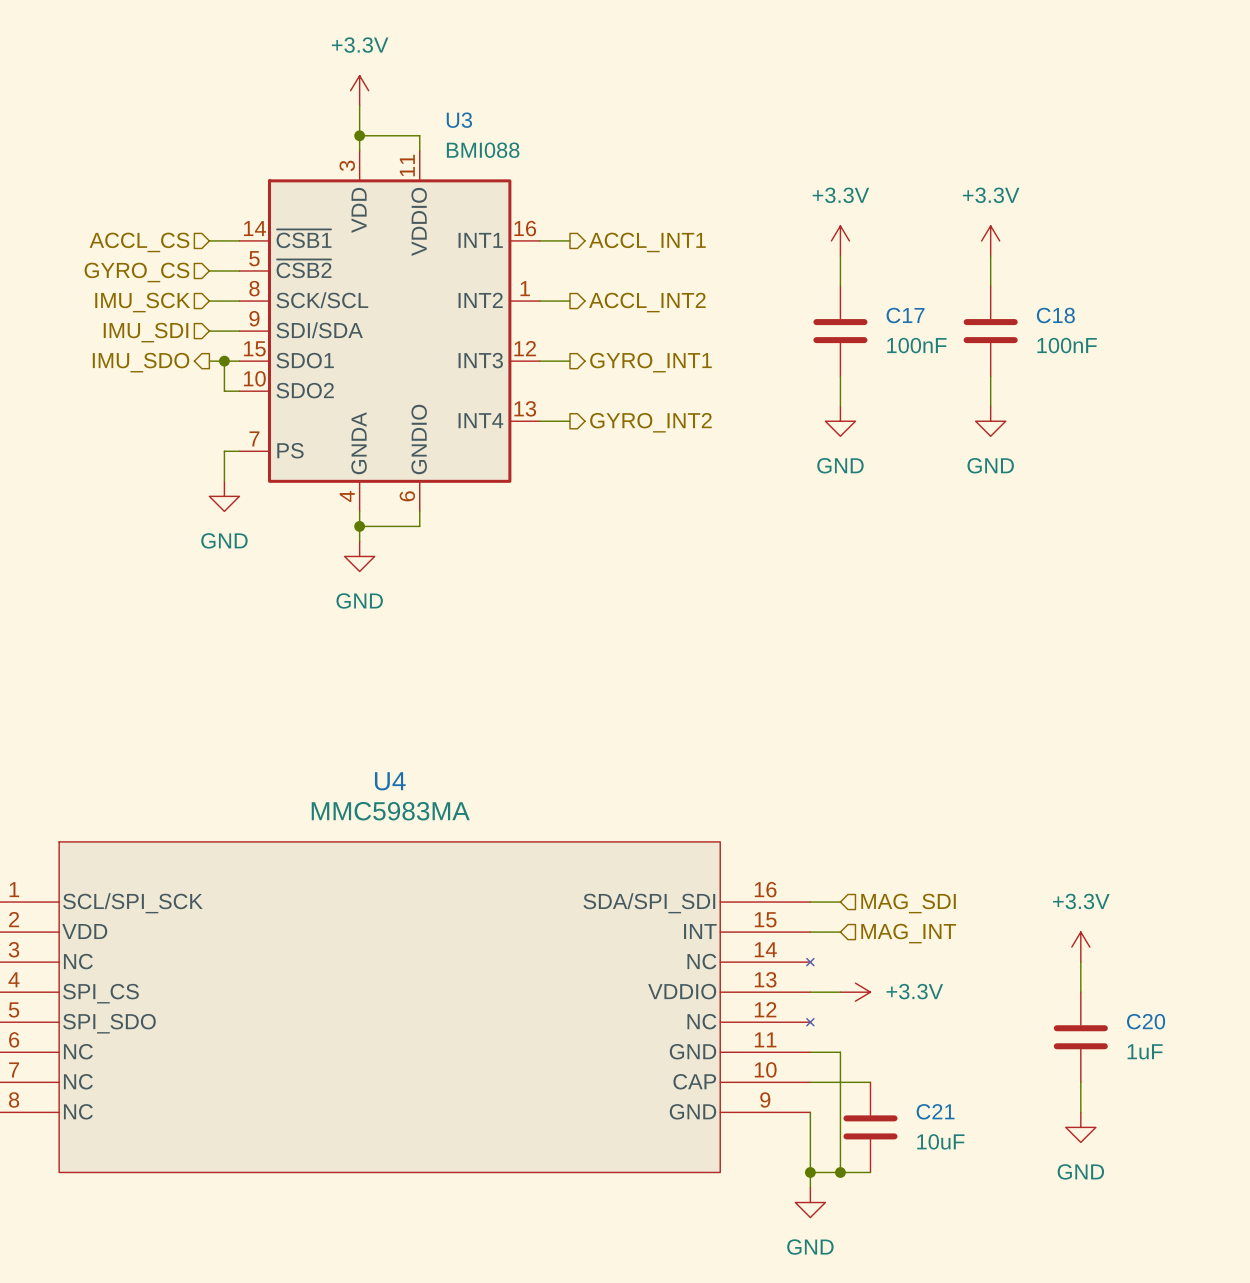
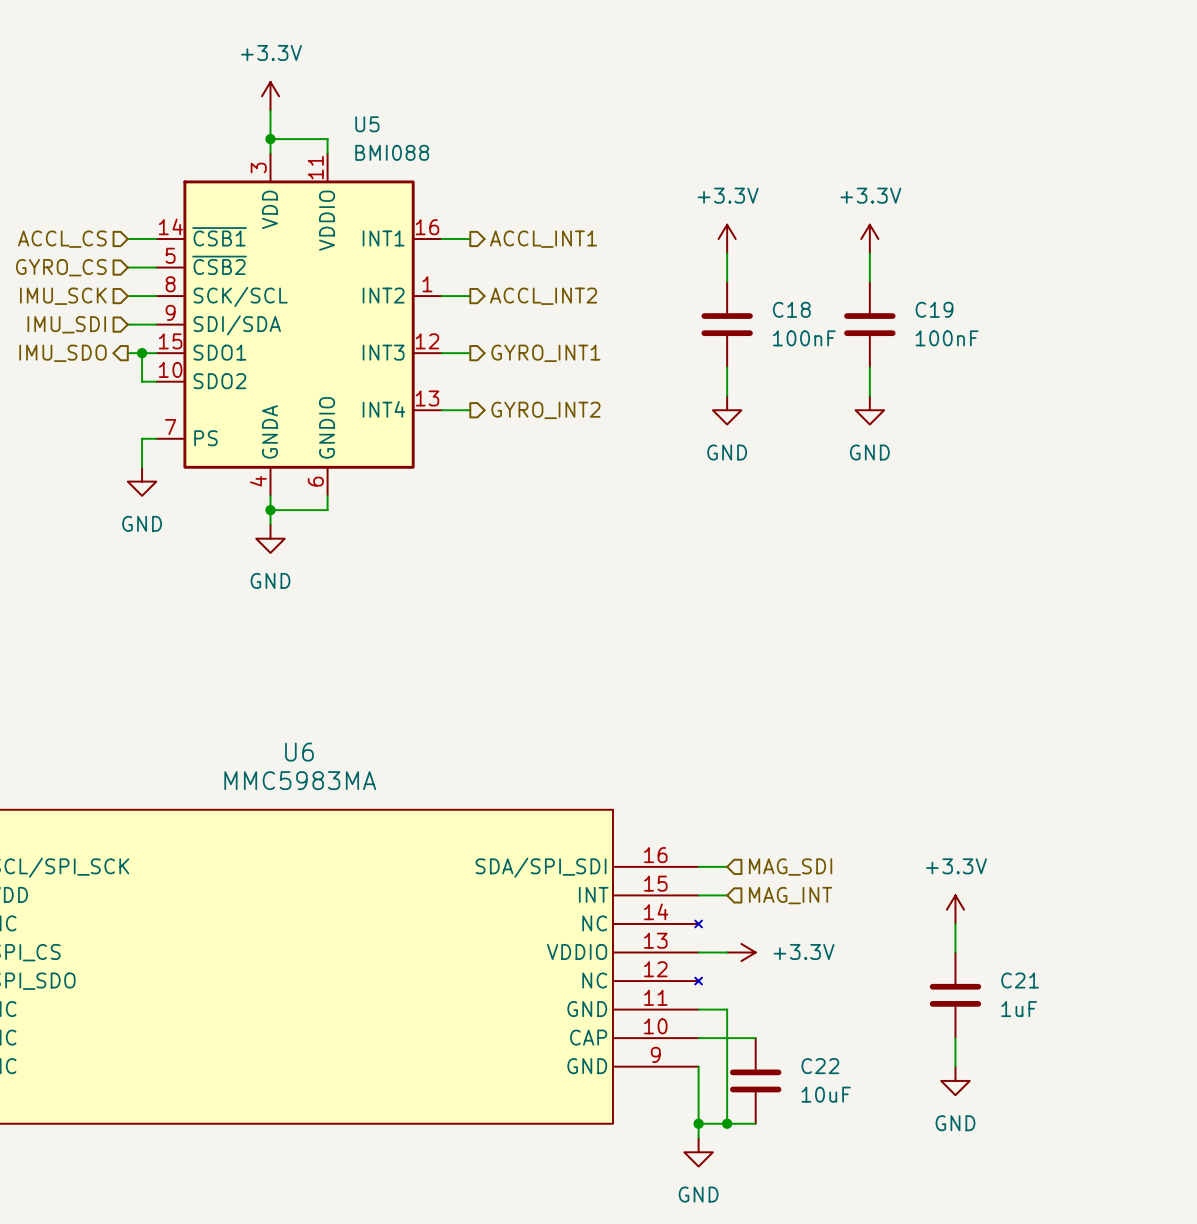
U3 name: U3 (459, 120) -> U5 (367, 124)
C17 name: C17 (905, 315) -> C18 (791, 309)
C18 name: C18 (1055, 315) -> C19 (934, 309)
U4 name: U4 (390, 781) -> U6 (299, 752)
C20 name: C20 (1146, 1021) -> C21 (1020, 980)
C21 name: C21 (935, 1111) -> C22 (820, 1066)

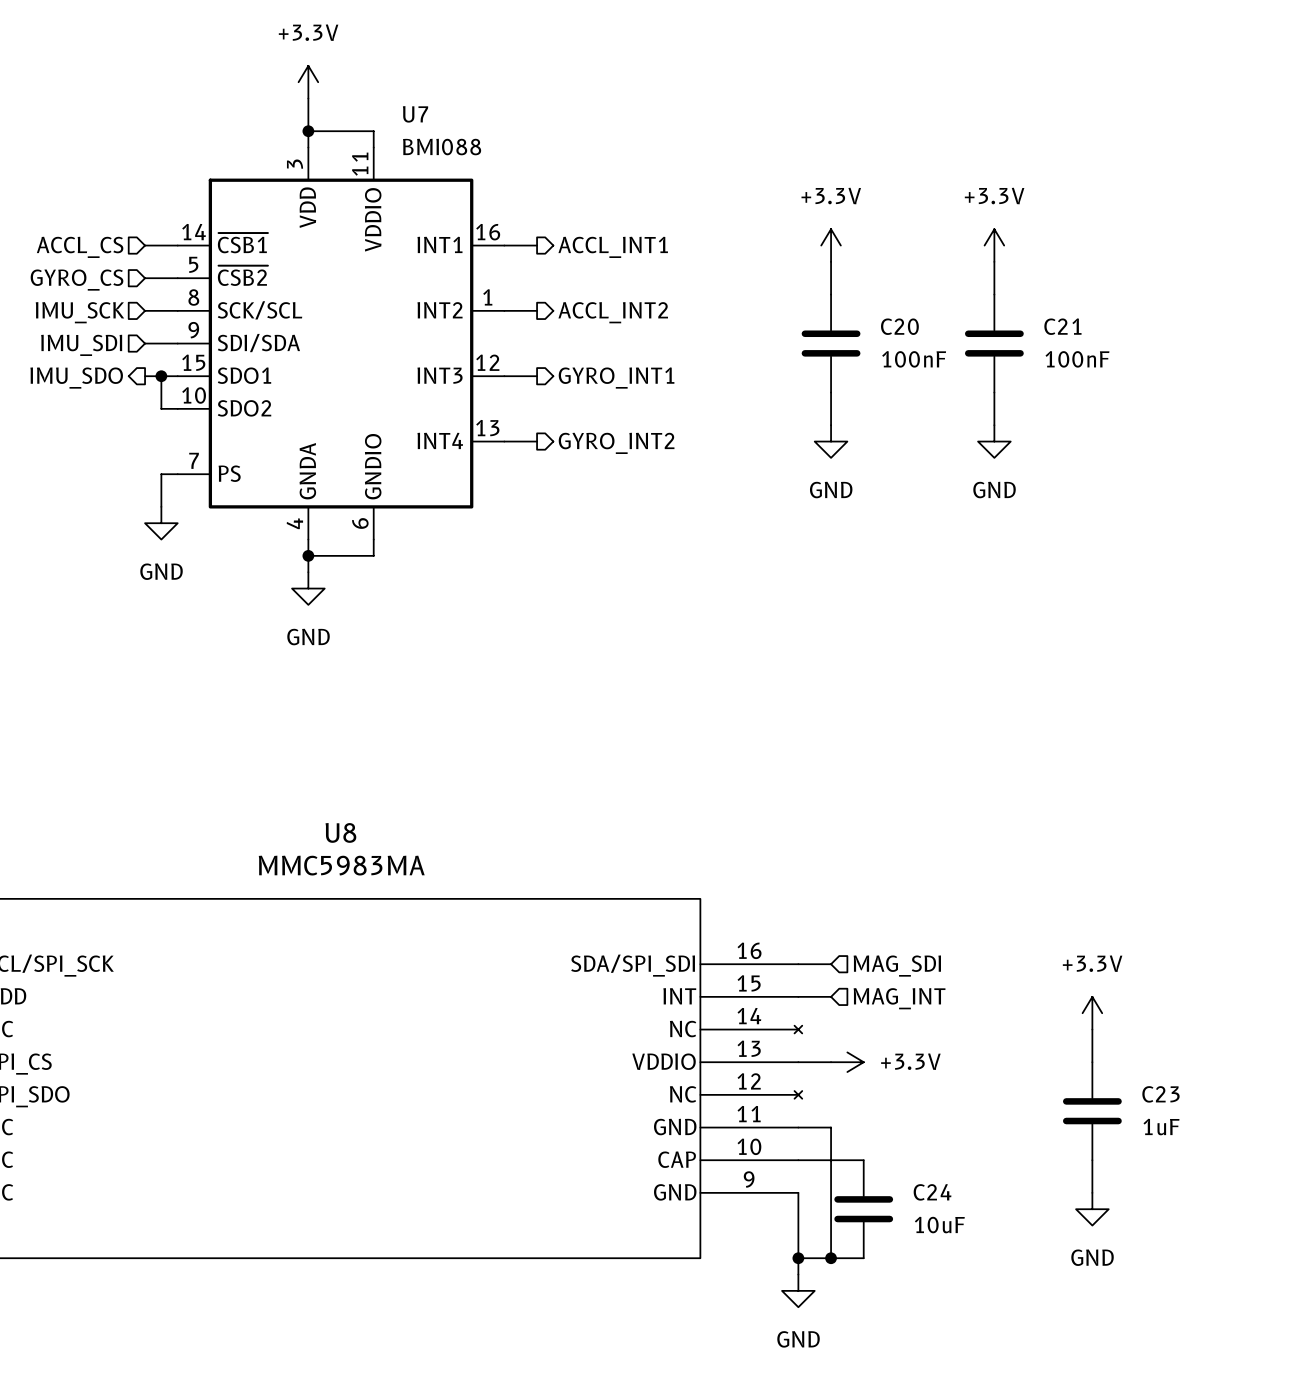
U5 name: U5 (367, 124) -> U7 (415, 114)
C18 name: C18 (791, 309) -> C20 (899, 326)
C19 name: C19 (934, 309) -> C21 (1062, 326)
U6 name: U6 (299, 752) -> U8 (340, 832)
C21 name: C21 (1020, 980) -> C23 (1160, 1094)
C22 name: C22 (820, 1066) -> C24 (932, 1192)

